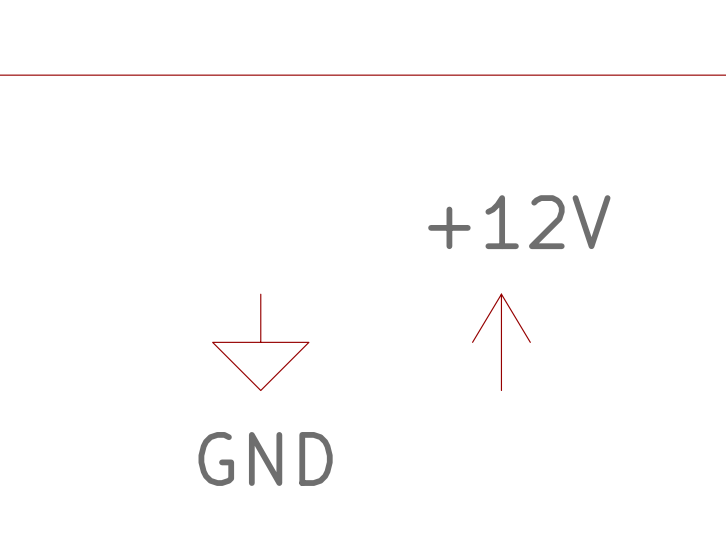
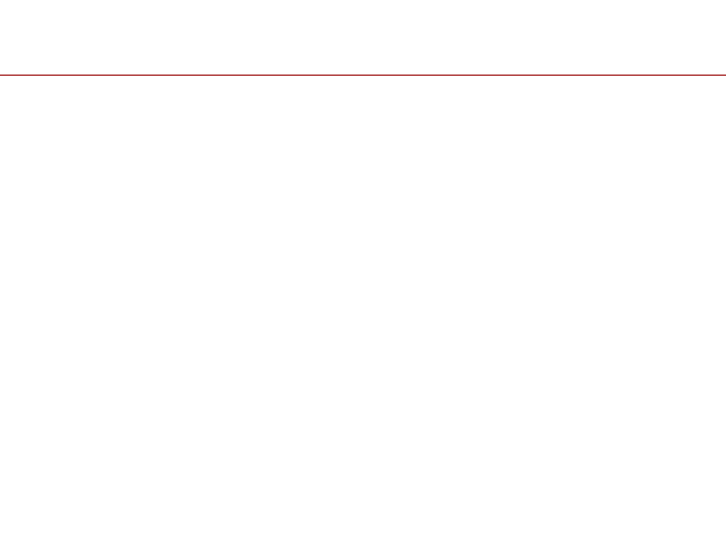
power symbol: GND (260, 342) -> none
power symbol: +12V (501, 342) -> none

